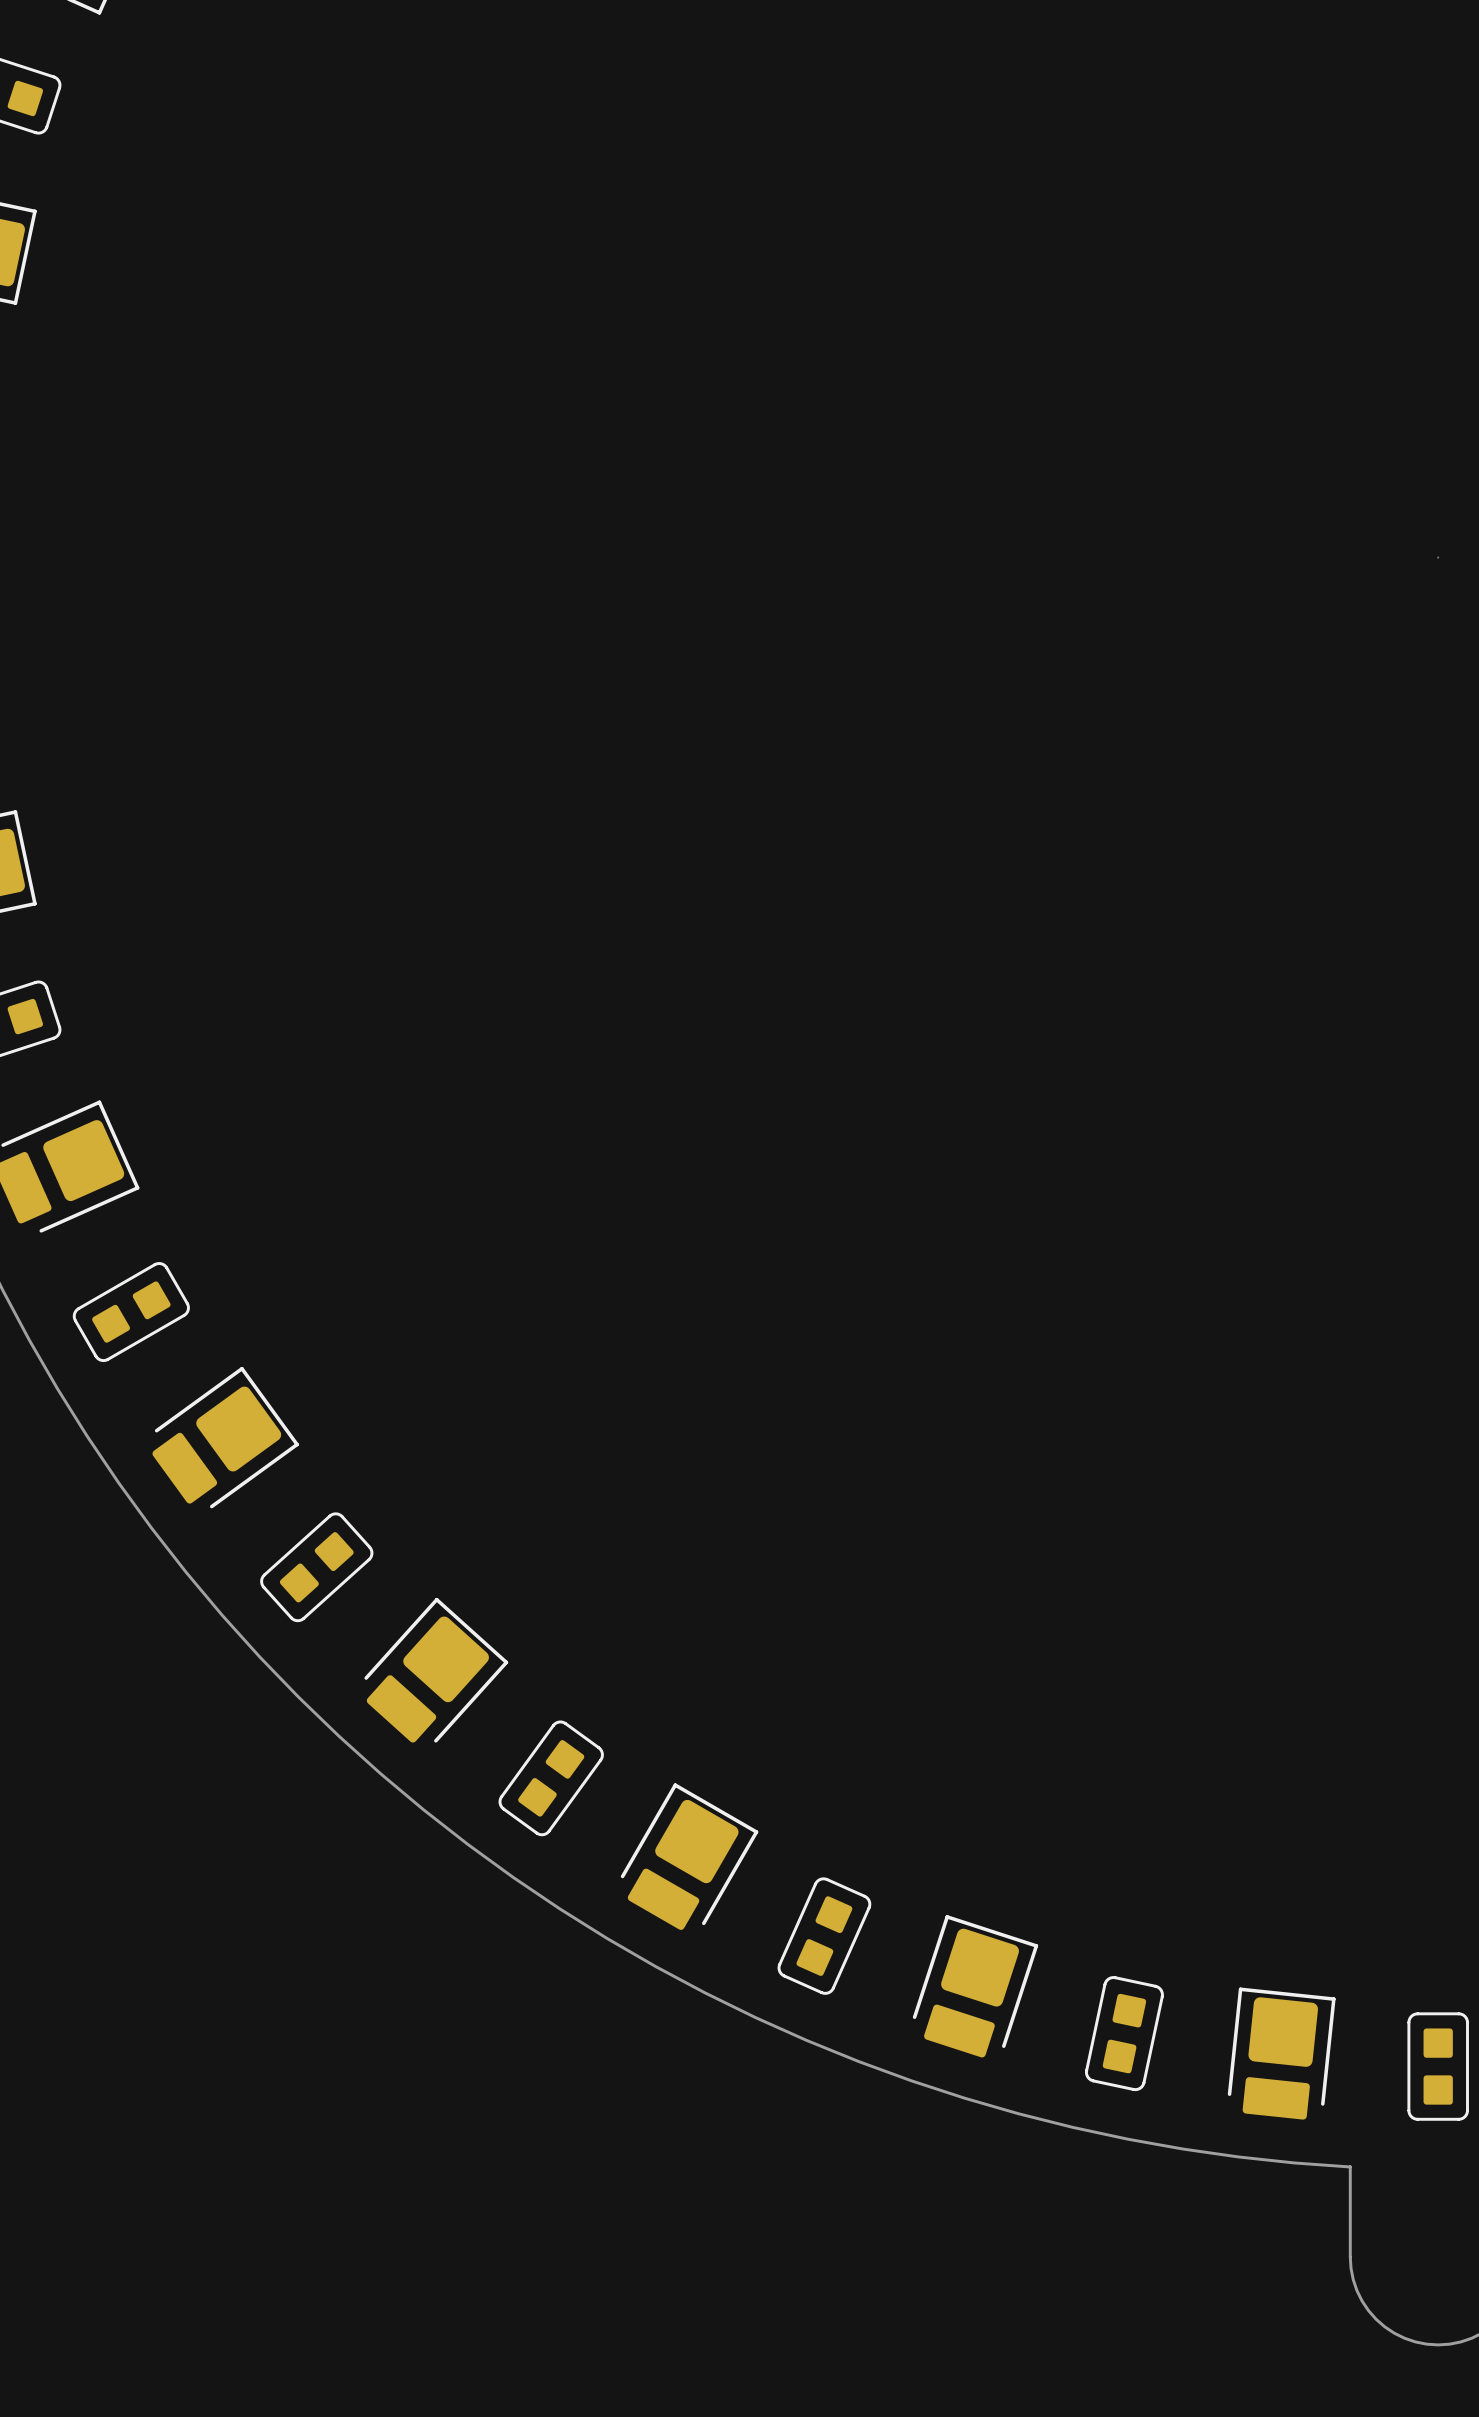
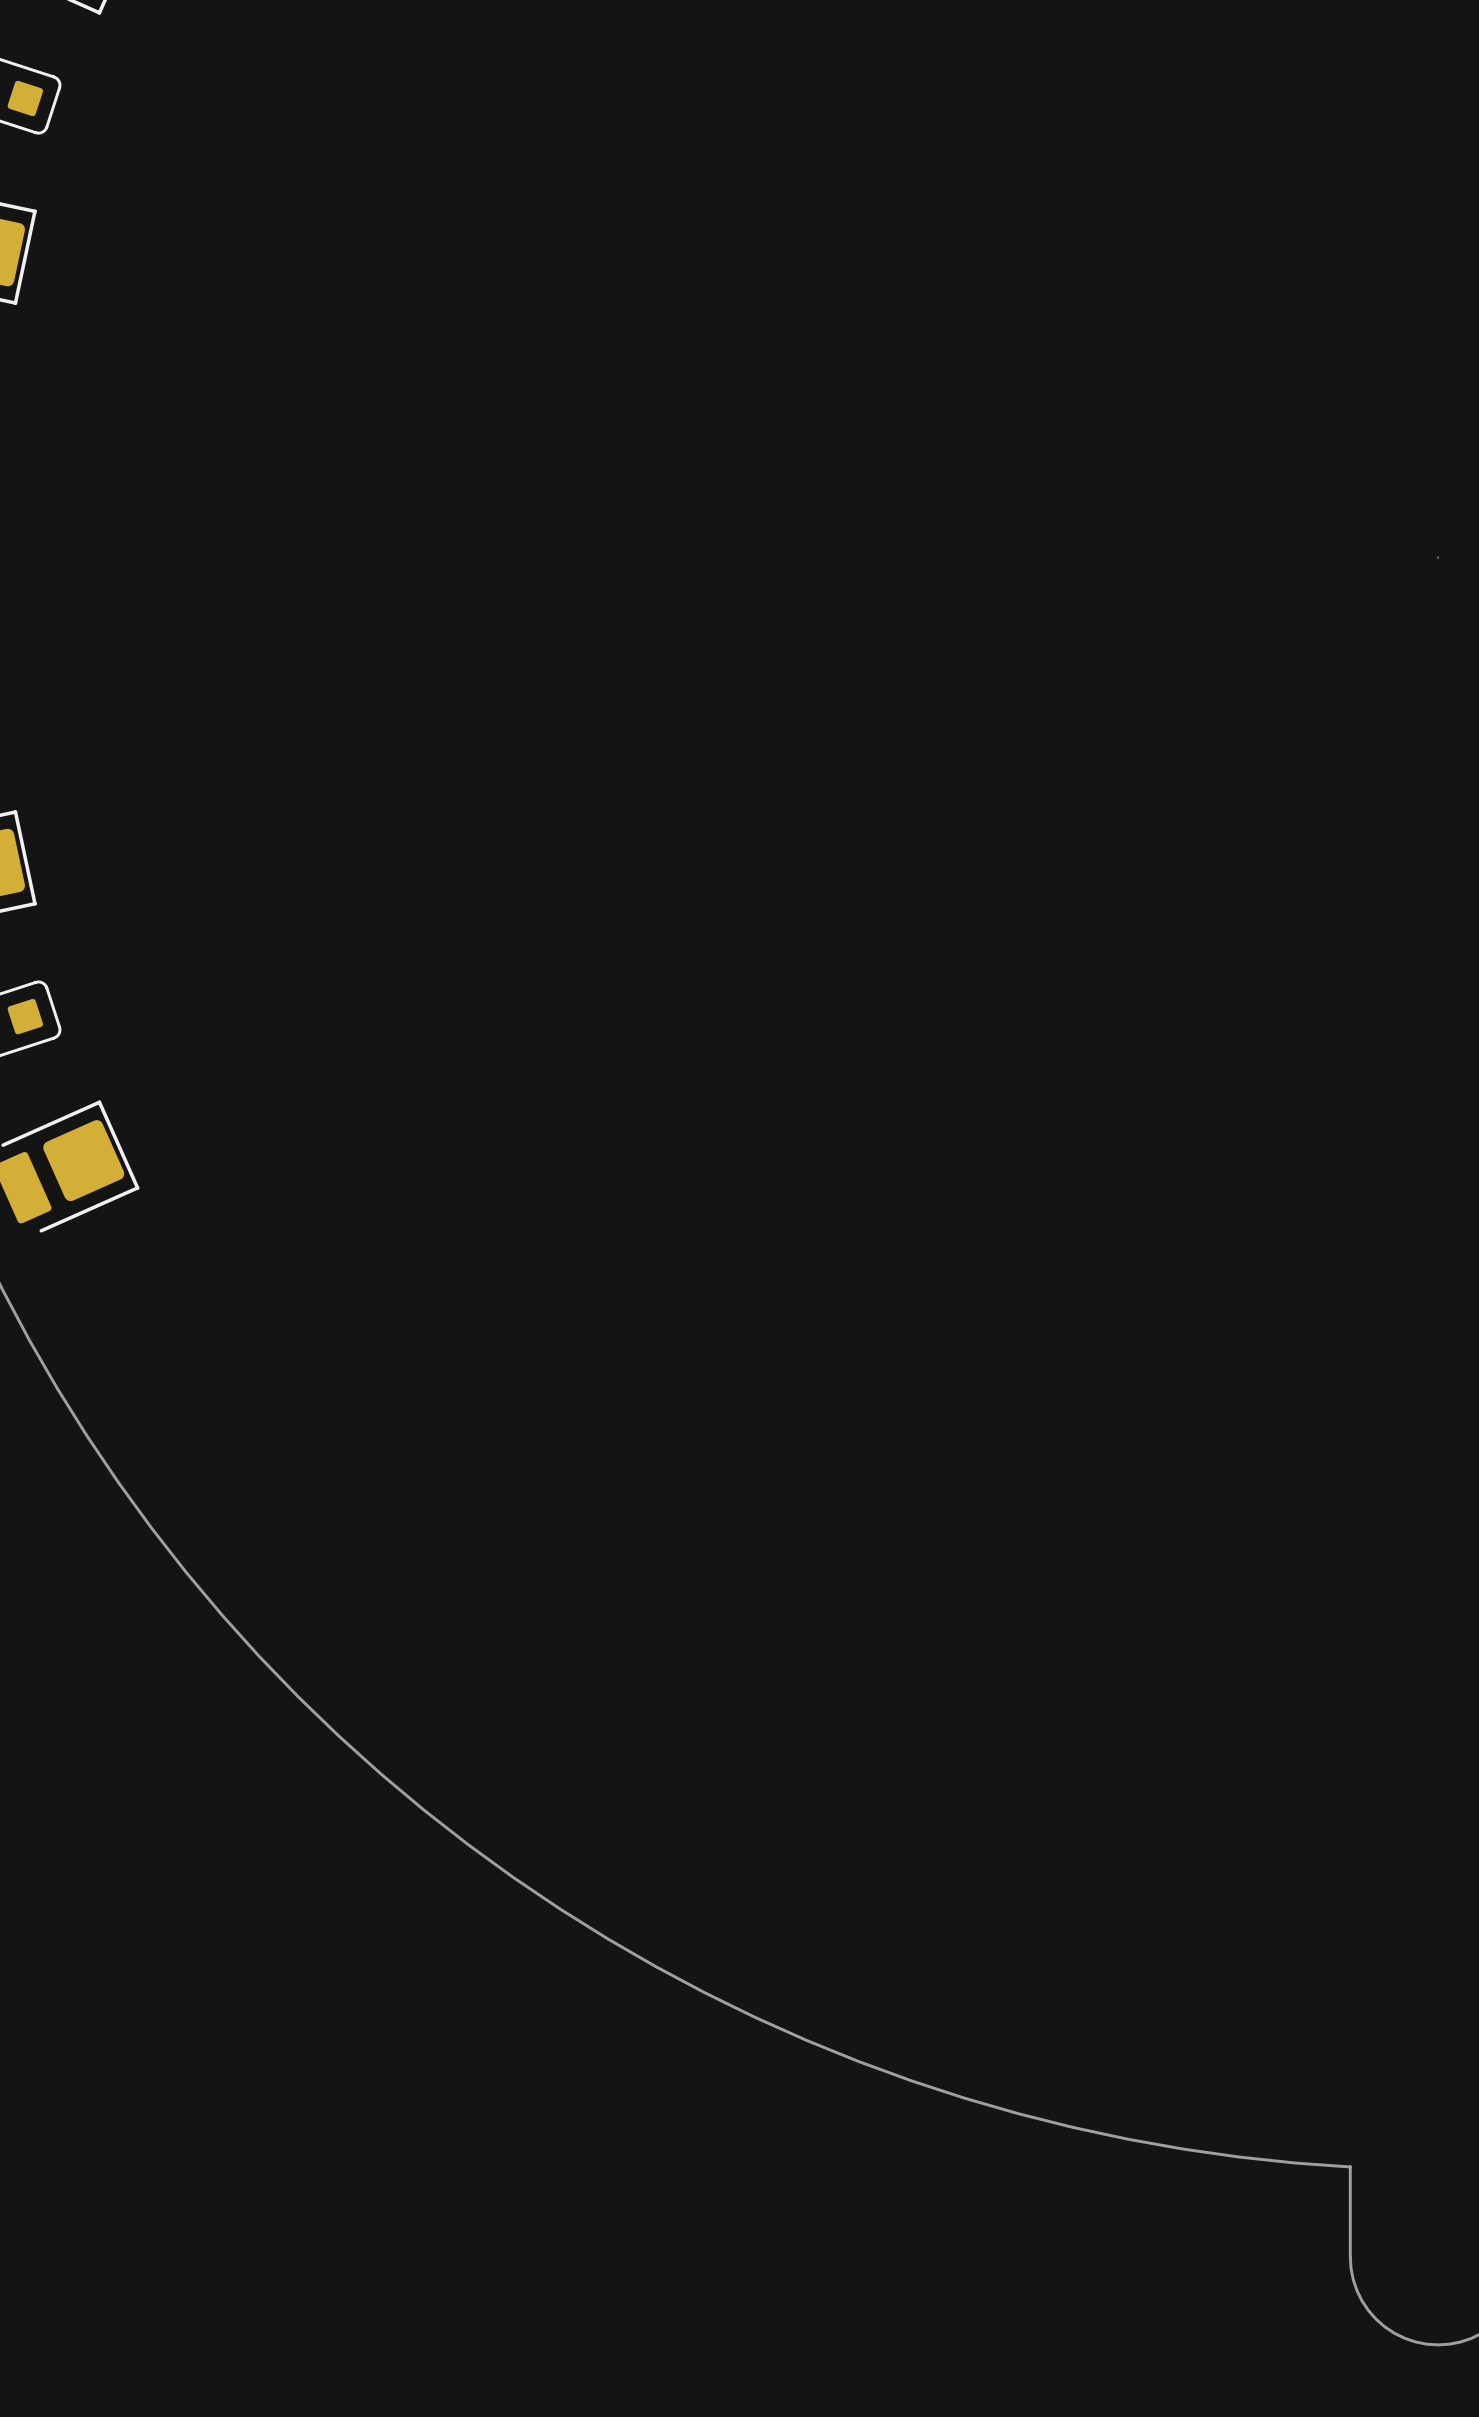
part: (131, 1312) -> none
part: (225, 1437) -> none
part: (316, 1567) -> none
part: (436, 1670) -> none
part: (551, 1778) -> none
part: (689, 1856) -> none
part: (824, 1936) -> none
part: (975, 1986) -> none
part: (1124, 2033) -> none
part: (1281, 2053) -> none
part: (1438, 2066) -> none

